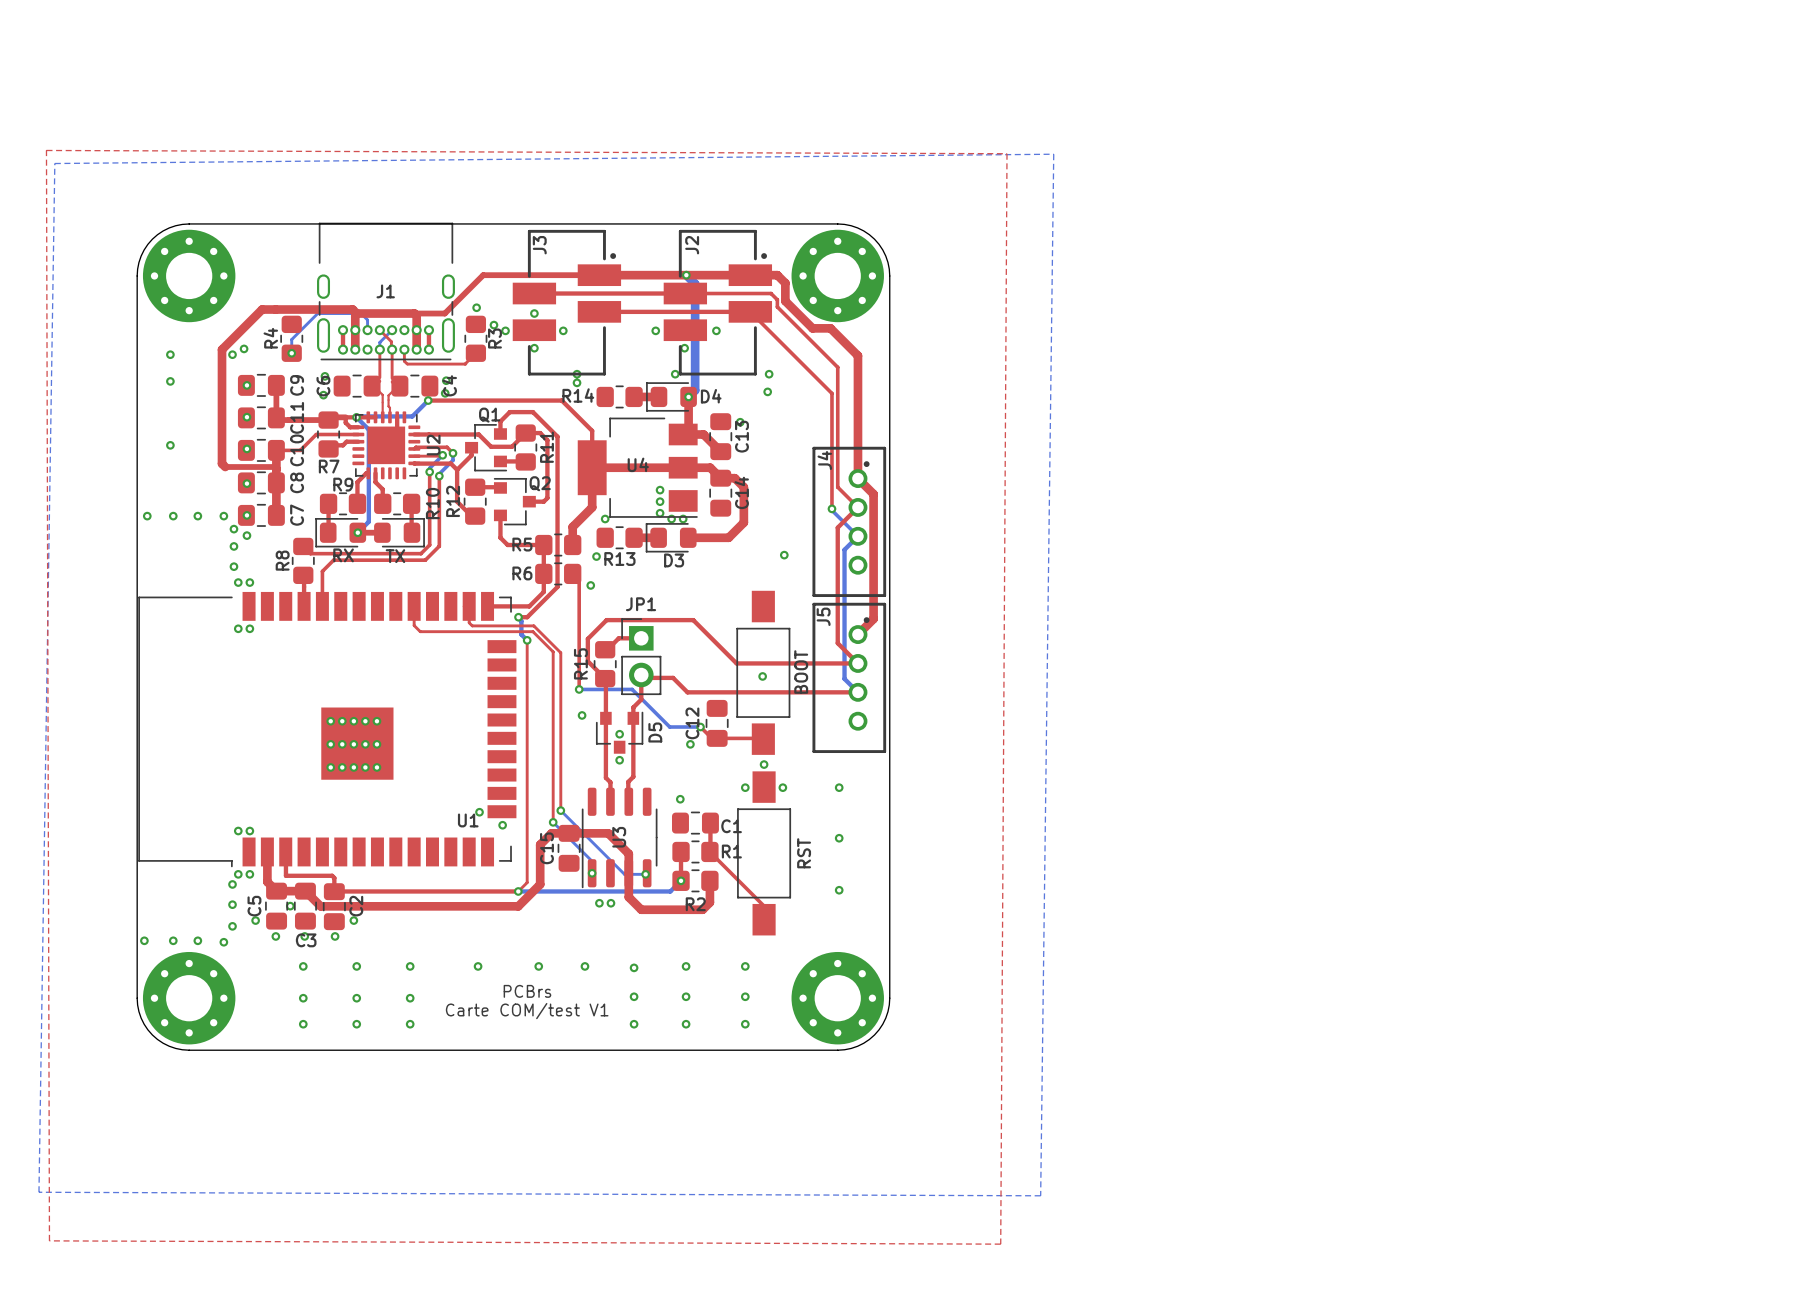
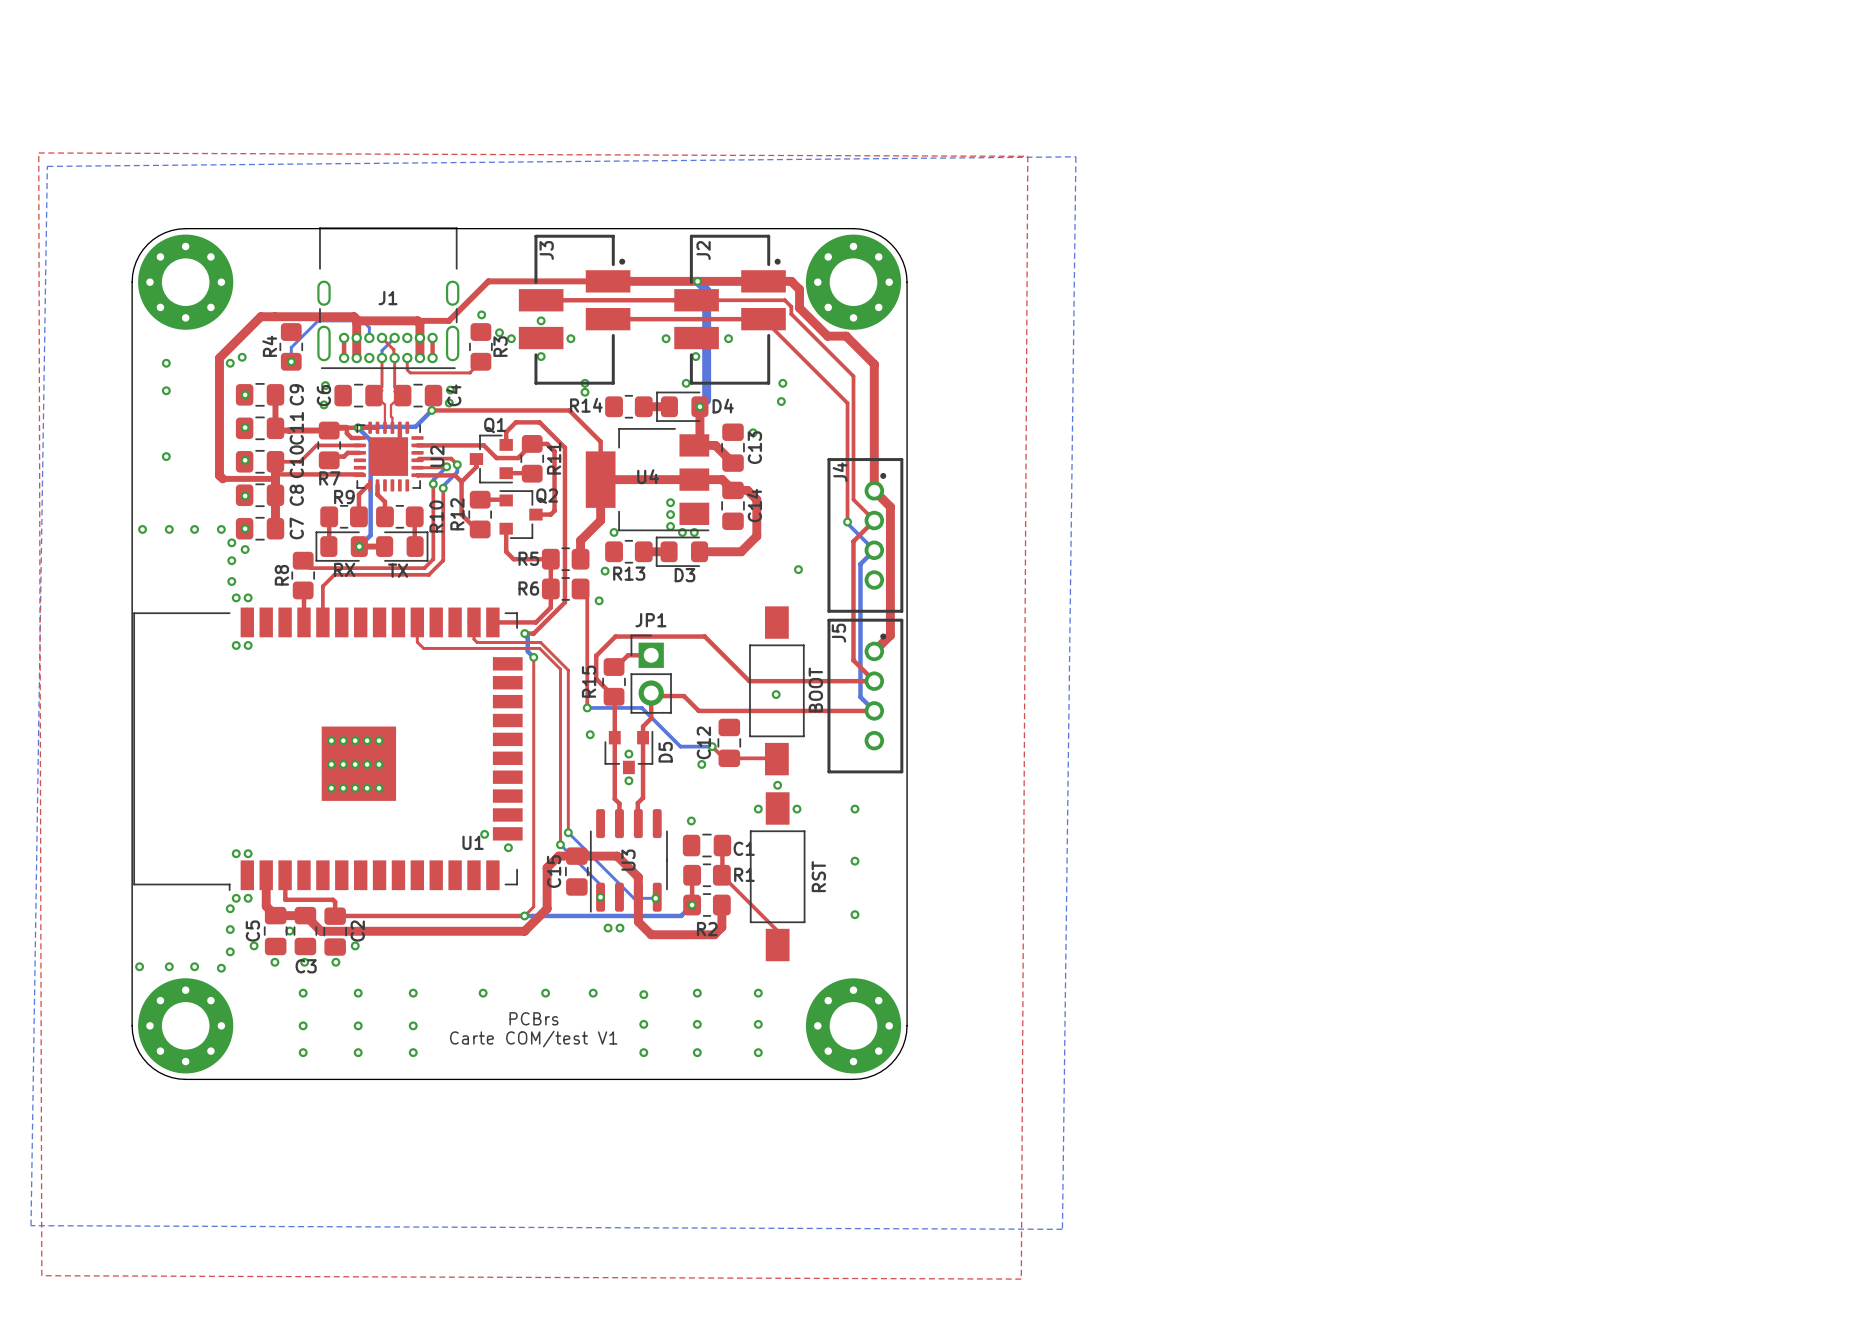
top track: none -> (280, 474) (362, 474)

